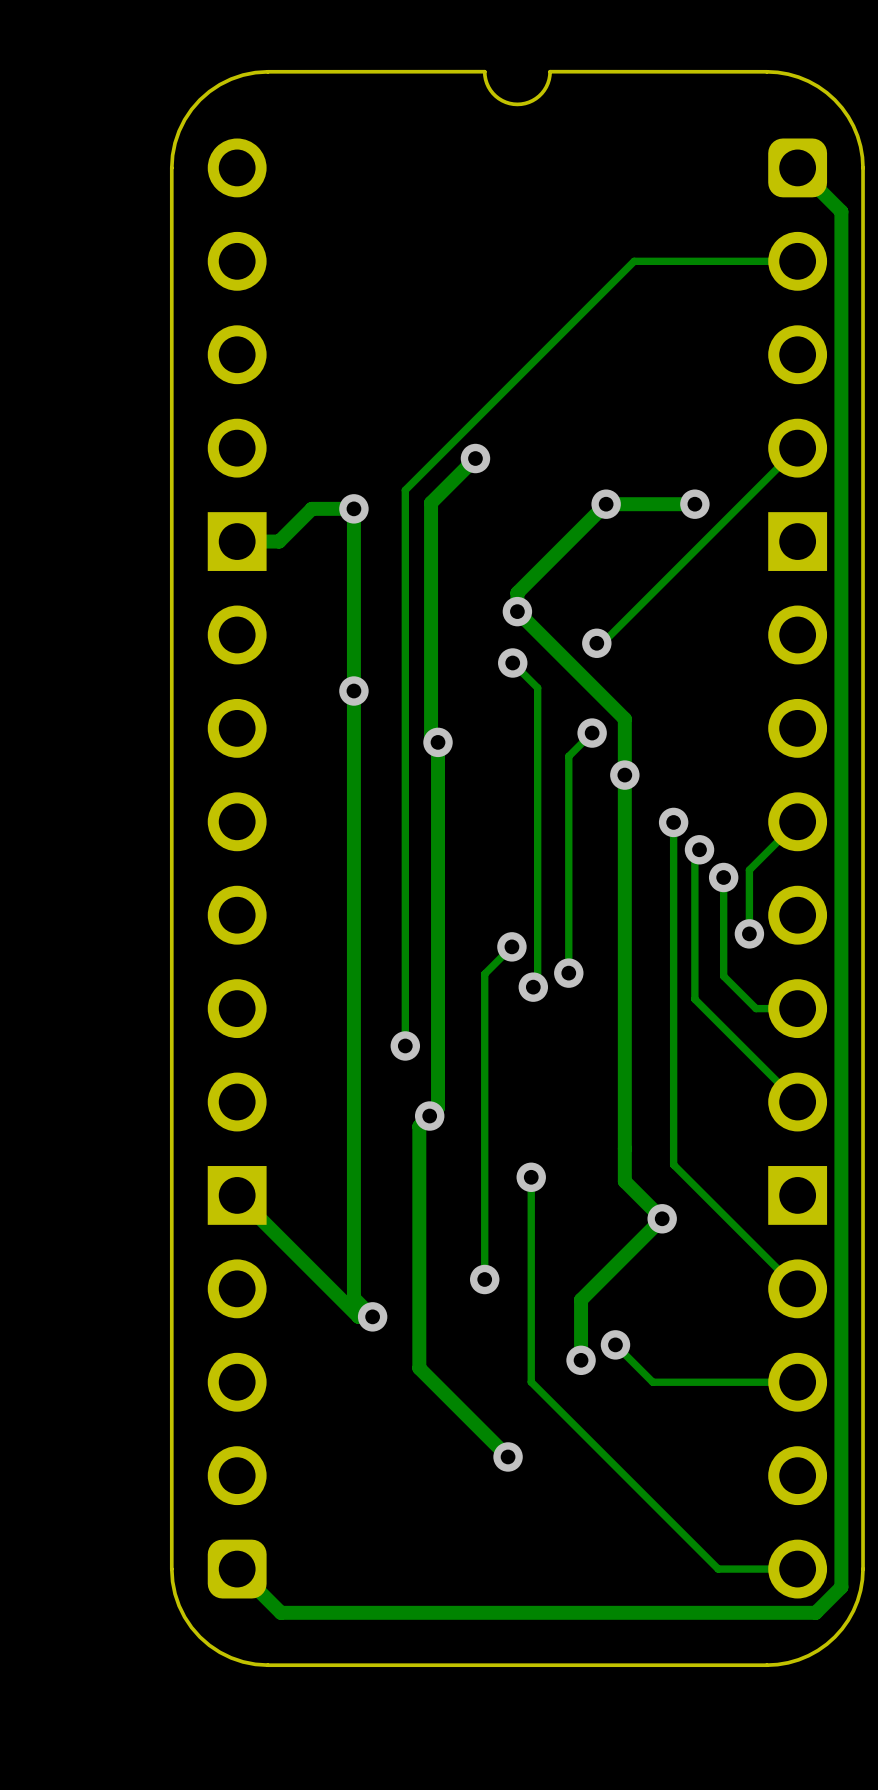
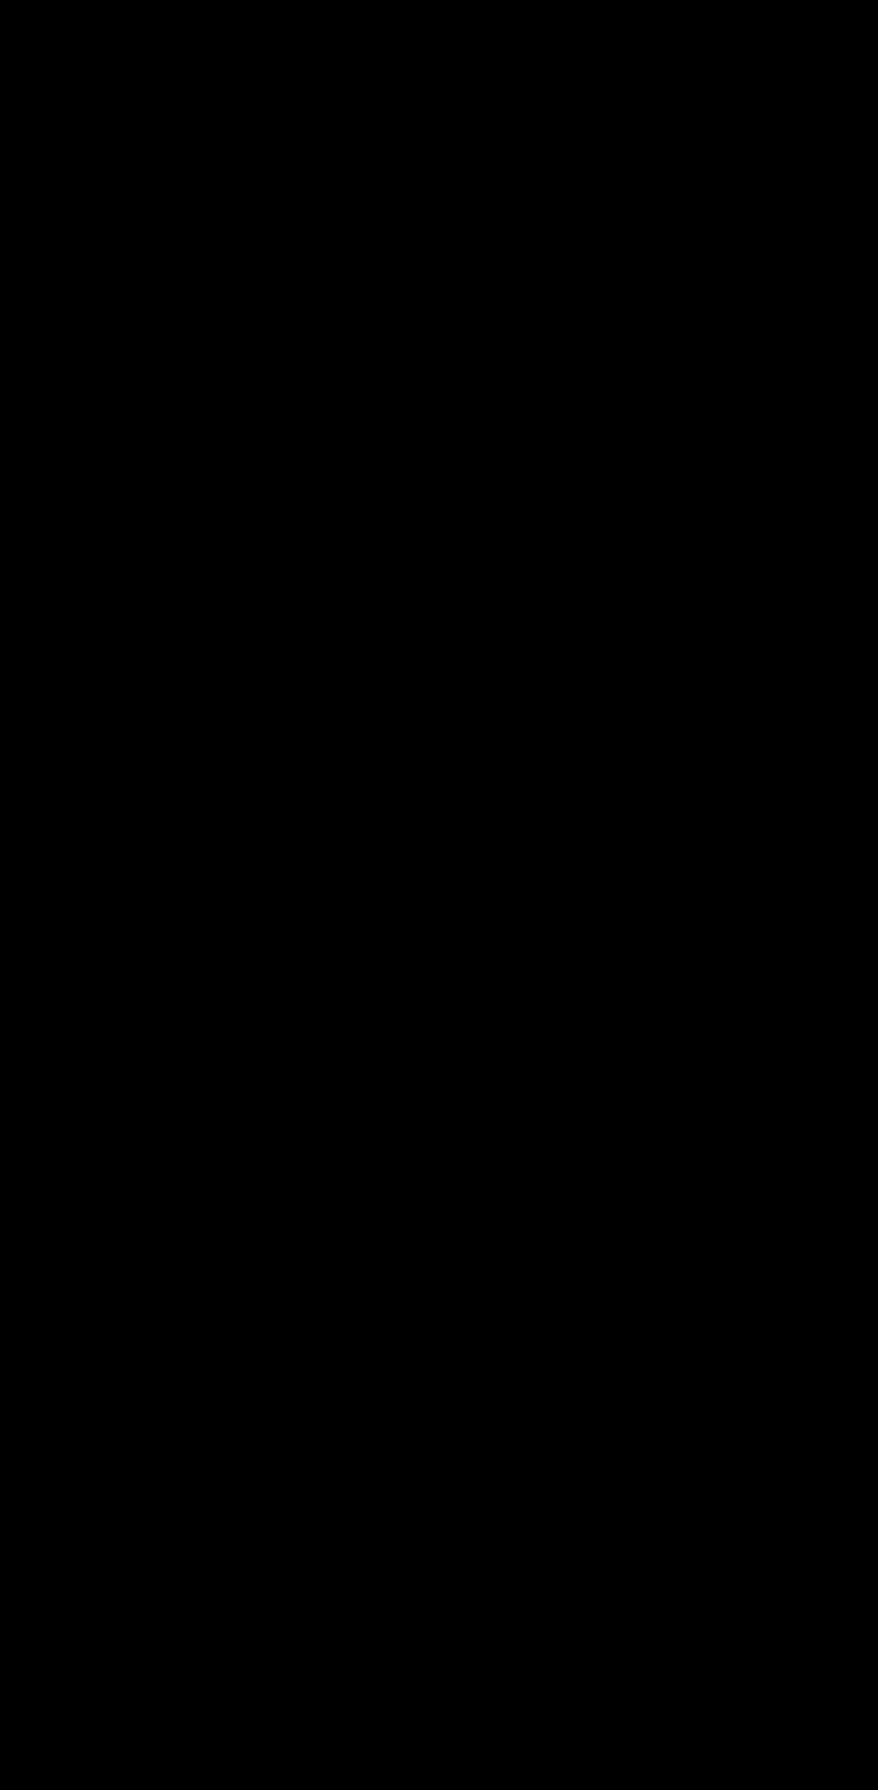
track: (797, 167) (841, 211) (841, 1587) (815, 1612) (280, 1612) (237, 1569) -> none
track: (797, 261) (634, 261) (405, 490) (405, 1045) -> none
track: (797, 448) (602, 643) (596, 643) -> none
track: (475, 458) (431, 502) (431, 735) (438, 742) (438, 1107) (419, 1126) (419, 1368) (508, 1456) -> none
via: (475, 458) -> none
via: (606, 504) -> none
track: (694, 504) (606, 504) (517, 592) (517, 611) (624, 719) (624, 1181) (662, 1218) (581, 1299) (581, 1360) -> none
via: (694, 504) -> none
via: (353, 508) -> none
track: (237, 541) (279, 541) (311, 508) (353, 508) (353, 1298) (372, 1316) (358, 1316) (237, 1195) -> none
via: (517, 611) -> none
via: (596, 643) -> none
track: (512, 662) (537, 687) (537, 982) (533, 987) -> none
via: (512, 662) -> none
via: (353, 691) -> none
track: (592, 733) (568, 756) (568, 973) -> none
via: (592, 733) -> none
via: (438, 742) -> none
via: (624, 775) -> none
track: (797, 821) (749, 870) (749, 933) -> none
track: (673, 822) (673, 1164) (797, 1288) -> none
via: (673, 822) -> none
track: (699, 849) (694, 854) (694, 999) (797, 1102) -> none
via: (699, 849) -> none
part: (517, 868) -> none
track: (723, 877) (723, 976) (756, 1008) (797, 1008) -> none
via: (723, 877) -> none
via: (749, 933) -> none
track: (511, 946) (484, 974) (484, 1279) -> none
via: (511, 946) -> none
via: (568, 973) -> none
via: (533, 987) -> none
via: (405, 1045) -> none
via: (429, 1116) -> none
track: (531, 1177) (531, 1382) (718, 1569) (797, 1569) -> none
via: (531, 1177) -> none
via: (662, 1218) -> none
via: (484, 1279) -> none
via: (372, 1316) -> none
track: (615, 1344) (652, 1382) (797, 1382) -> none
via: (615, 1344) -> none
via: (581, 1360) -> none
via: (508, 1456) -> none

